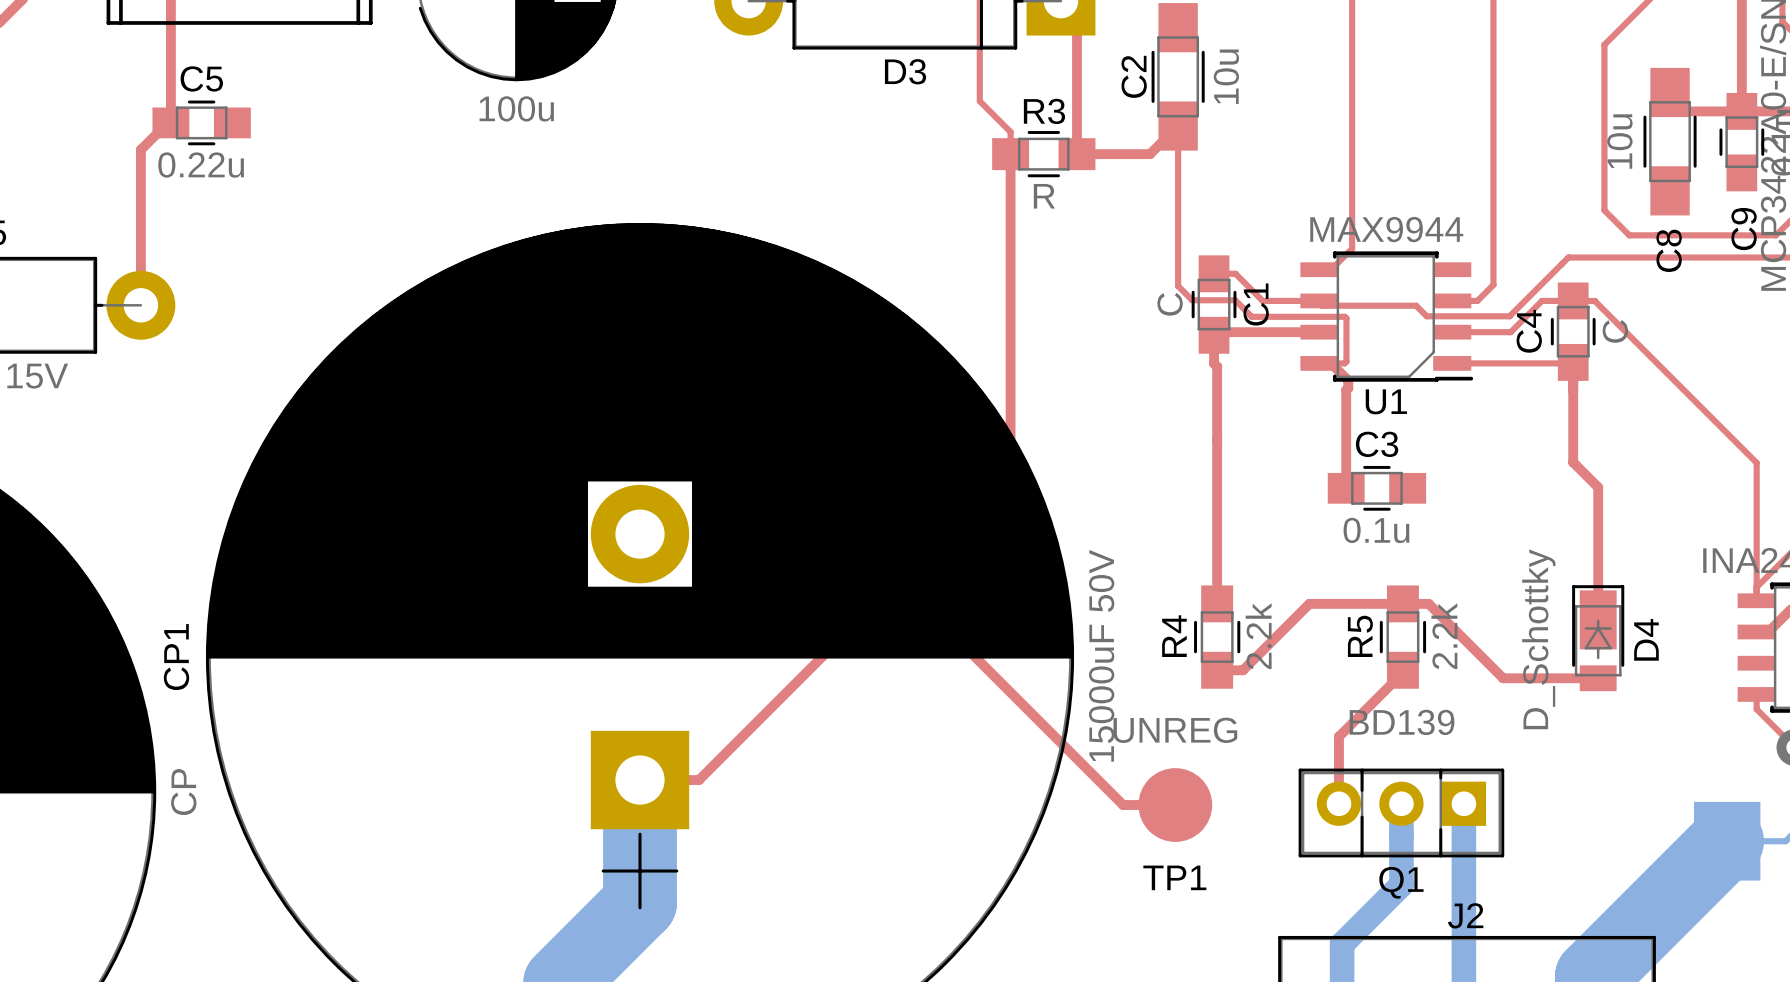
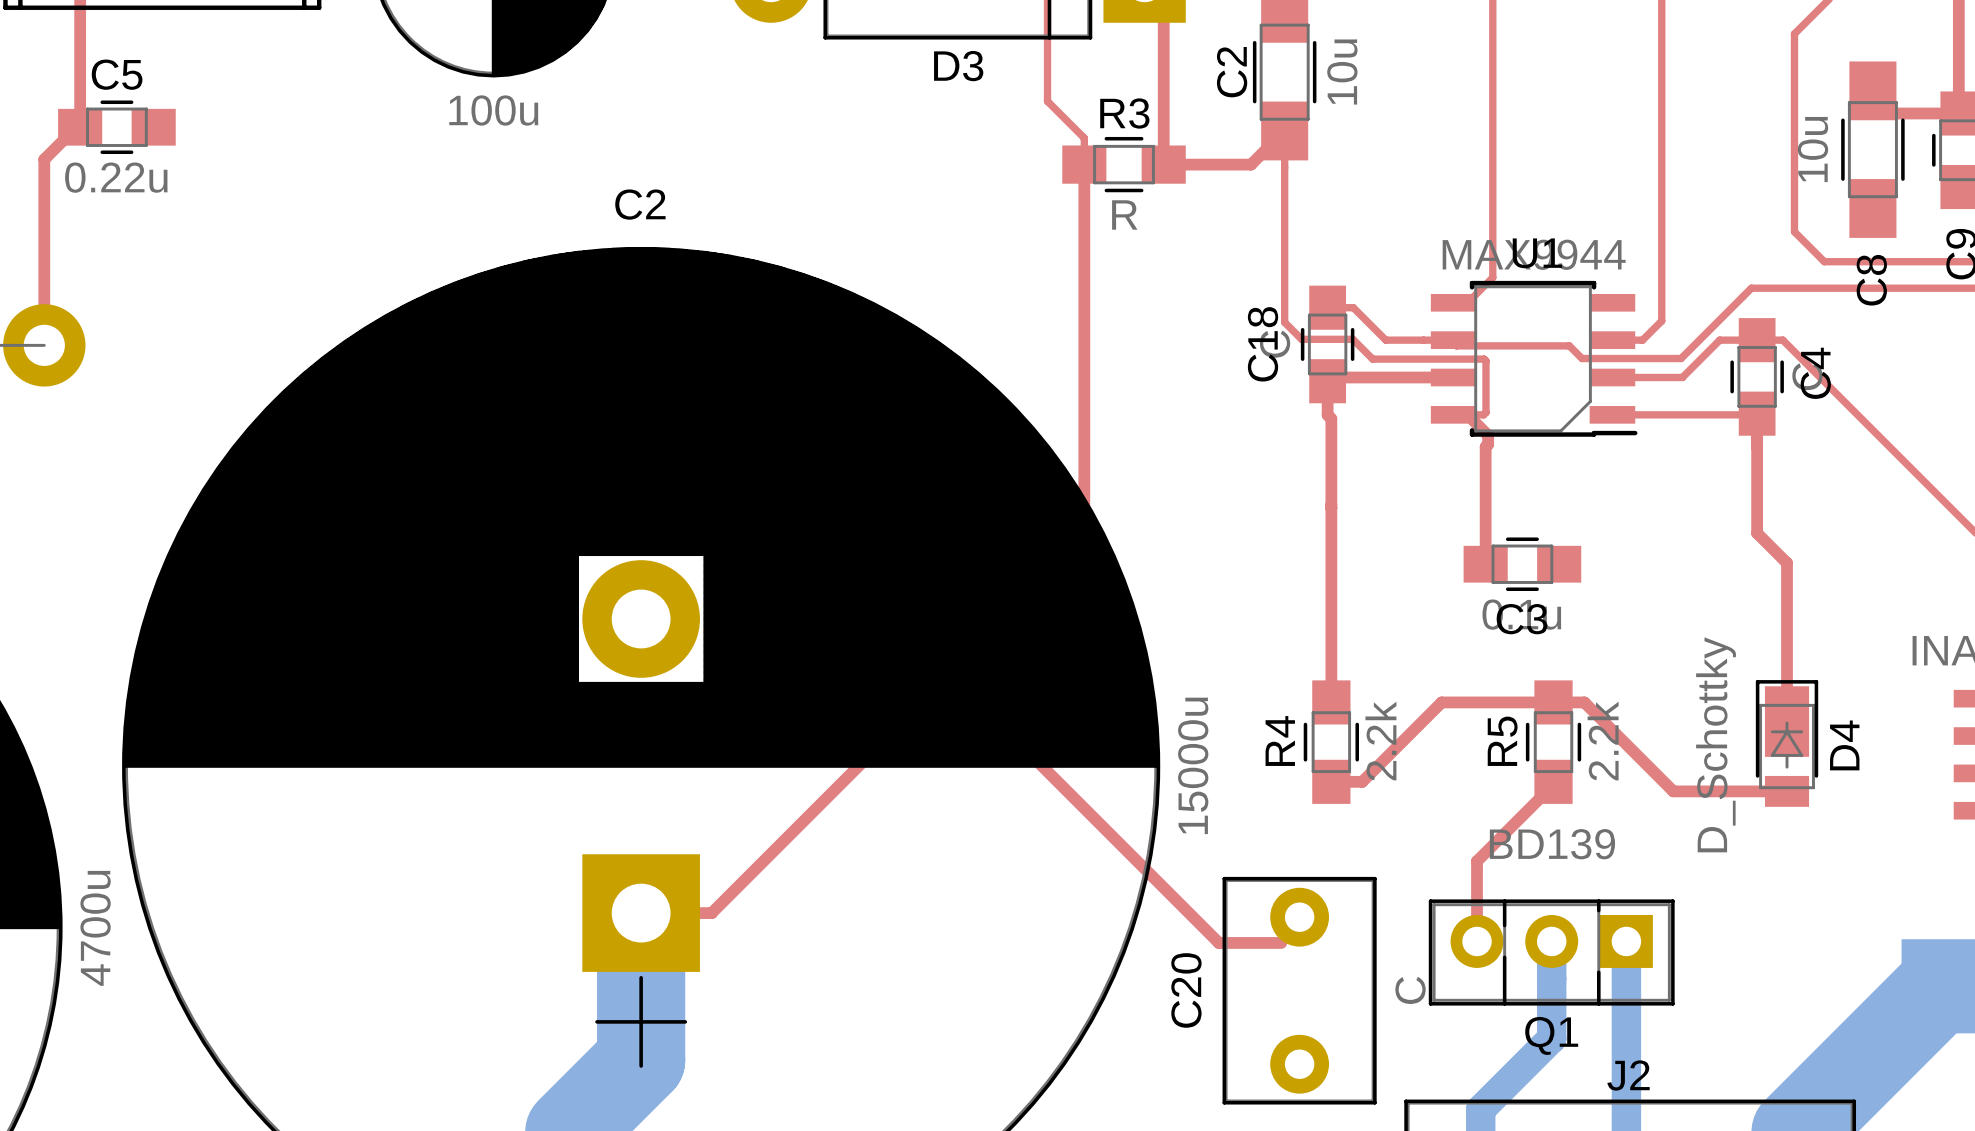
C1 name: C1 (1256, 304) -> C18 (1263, 344)
C4 name position: C4 (1529, 331) -> C4 (1815, 373)
U1 name position: U1 (1386, 401) -> U1 (1537, 253)
C3 name position: C3 (1377, 444) -> C3 (1521, 619)
CP1 value: 15000uF 50V (1101, 655) -> 15000u (1193, 765)
CP1 name: CP1 (176, 657) -> C2 (640, 204)
part value: CP (183, 792) -> 4700u (95, 928)
TP1: UNREG (1175, 805) -> none
C20: none -> C (1299, 990)

